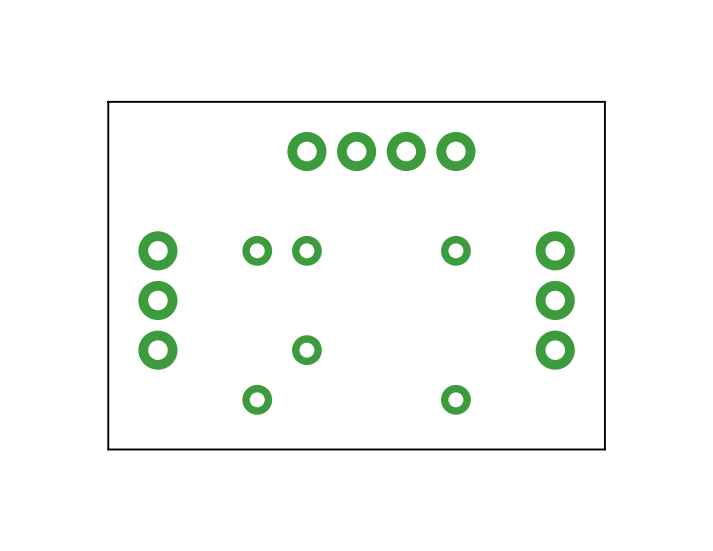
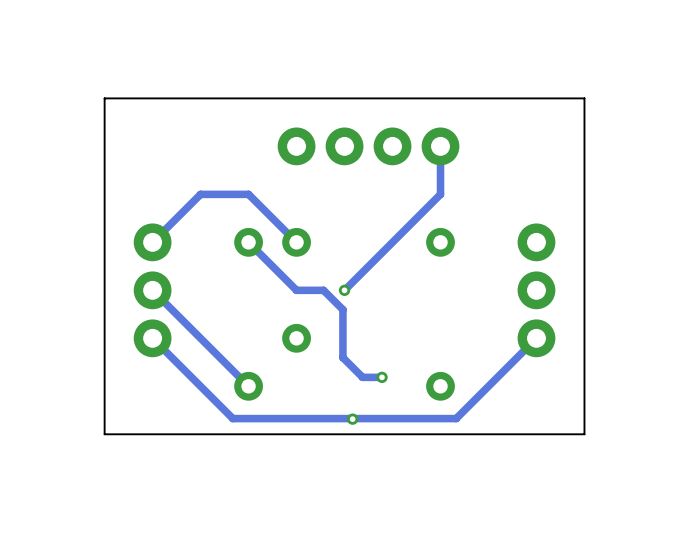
track: none -> (440, 146) (440, 194) (344, 290)
track: none -> (248, 242) (296, 290) (323, 290) (342, 309) (342, 357) (362, 377) (382, 377)
track: none -> (296, 242) (248, 194) (200, 194) (152, 242)
track: none -> (152, 290) (248, 386)
via: none -> (344, 290)
track: none -> (536, 338) (456, 418) (352, 419) (232, 418) (152, 338)
via: none -> (382, 377)
via: none -> (352, 419)

